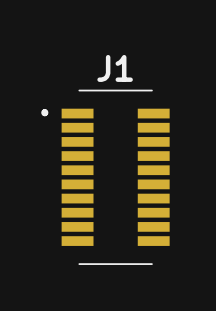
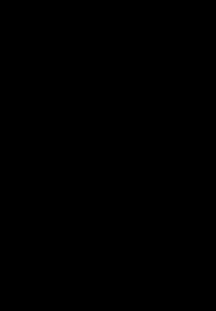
J1: (105, 177) -> none

